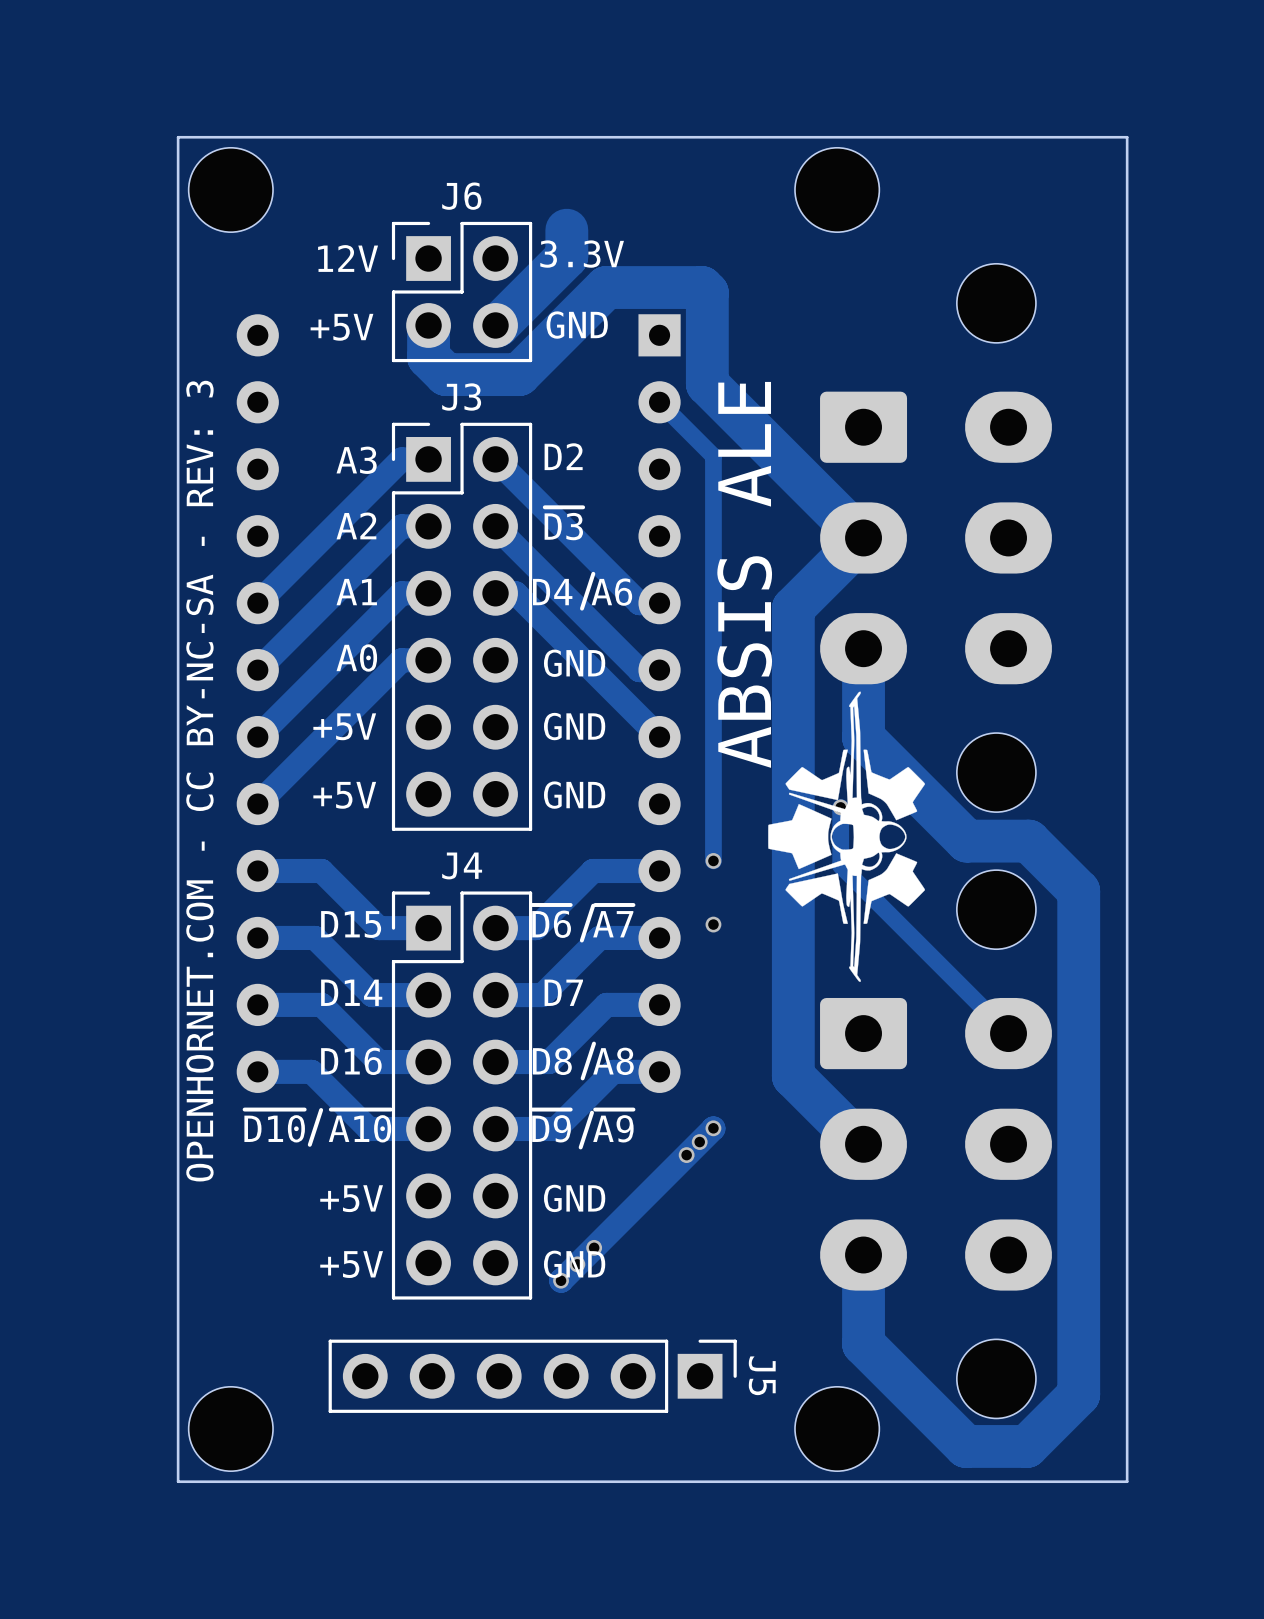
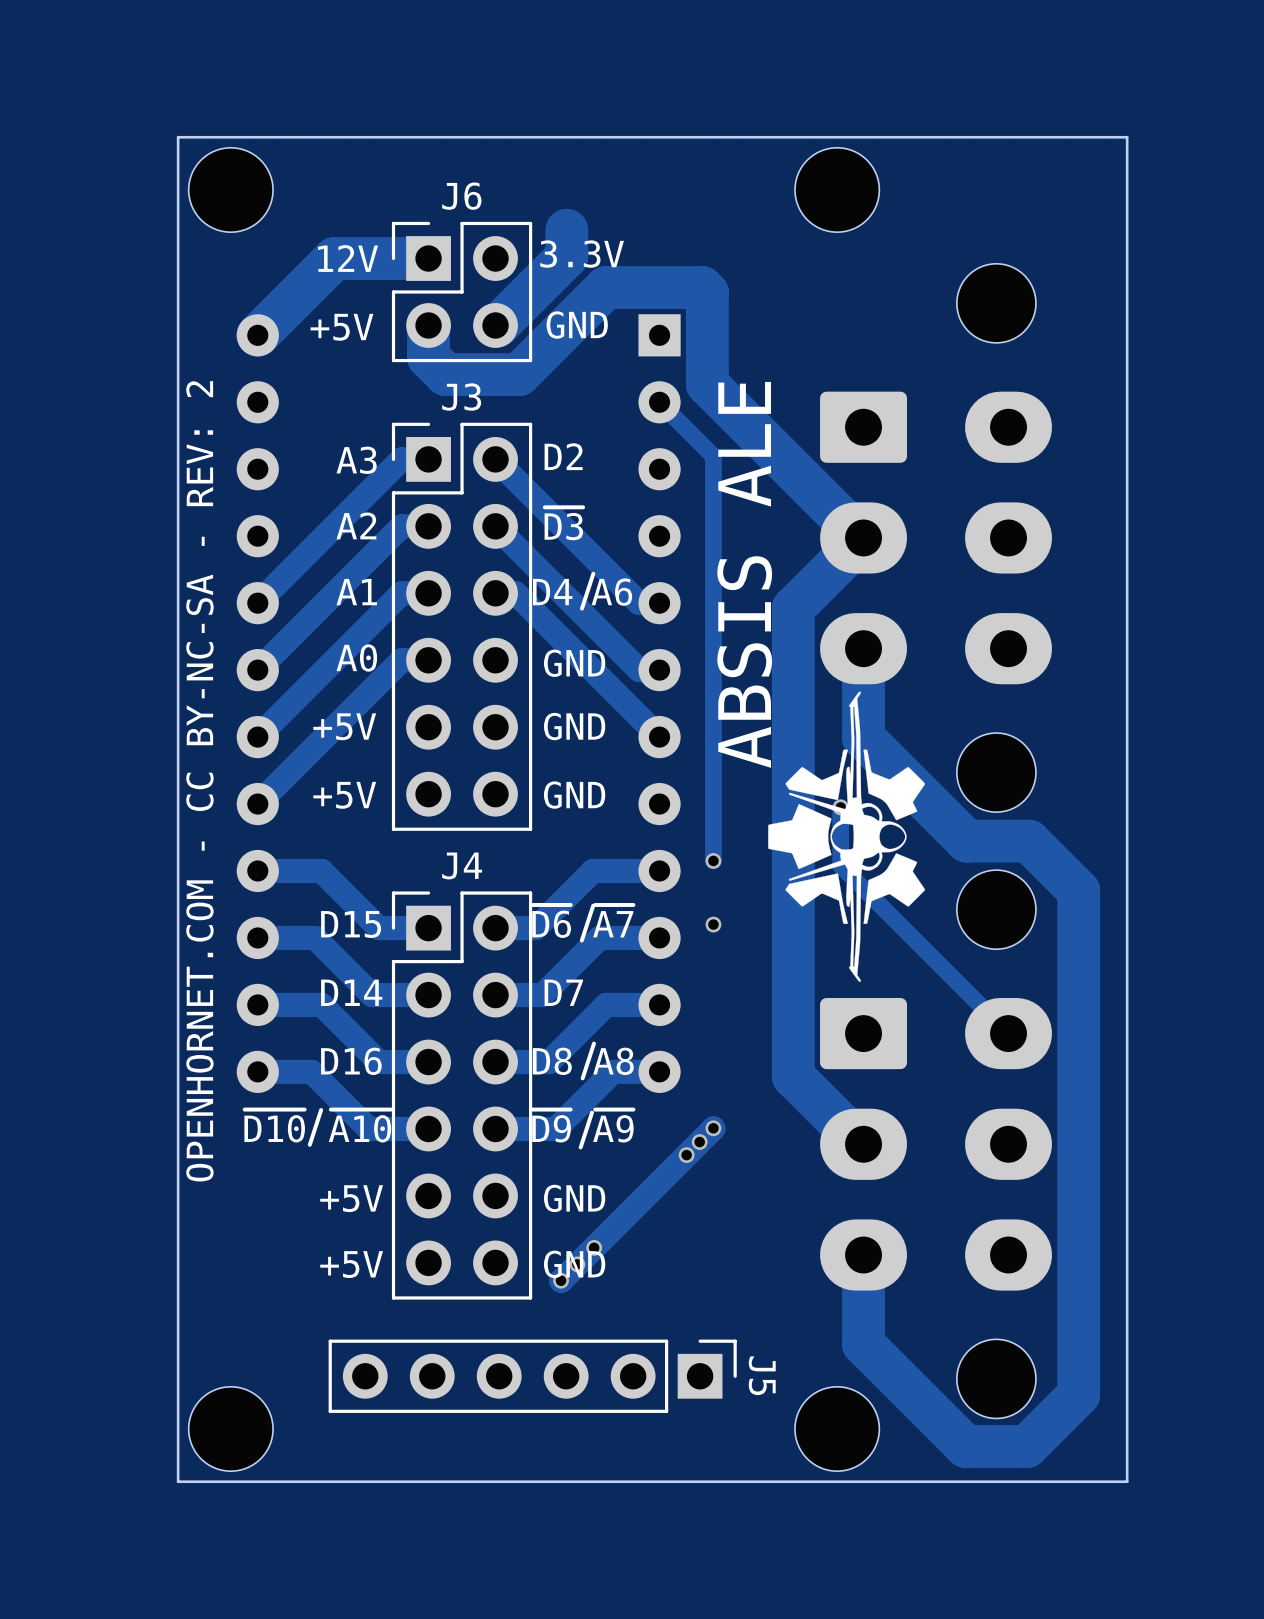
track: none -> (428, 258) (334, 258) (257, 335)
text: OPENHORNET.COM - CC BY-NC-SA - REV: 3 (199, 781) -> OPENHORNET.COM - CC BY-NC-SA - REV: 2 (199, 781)

